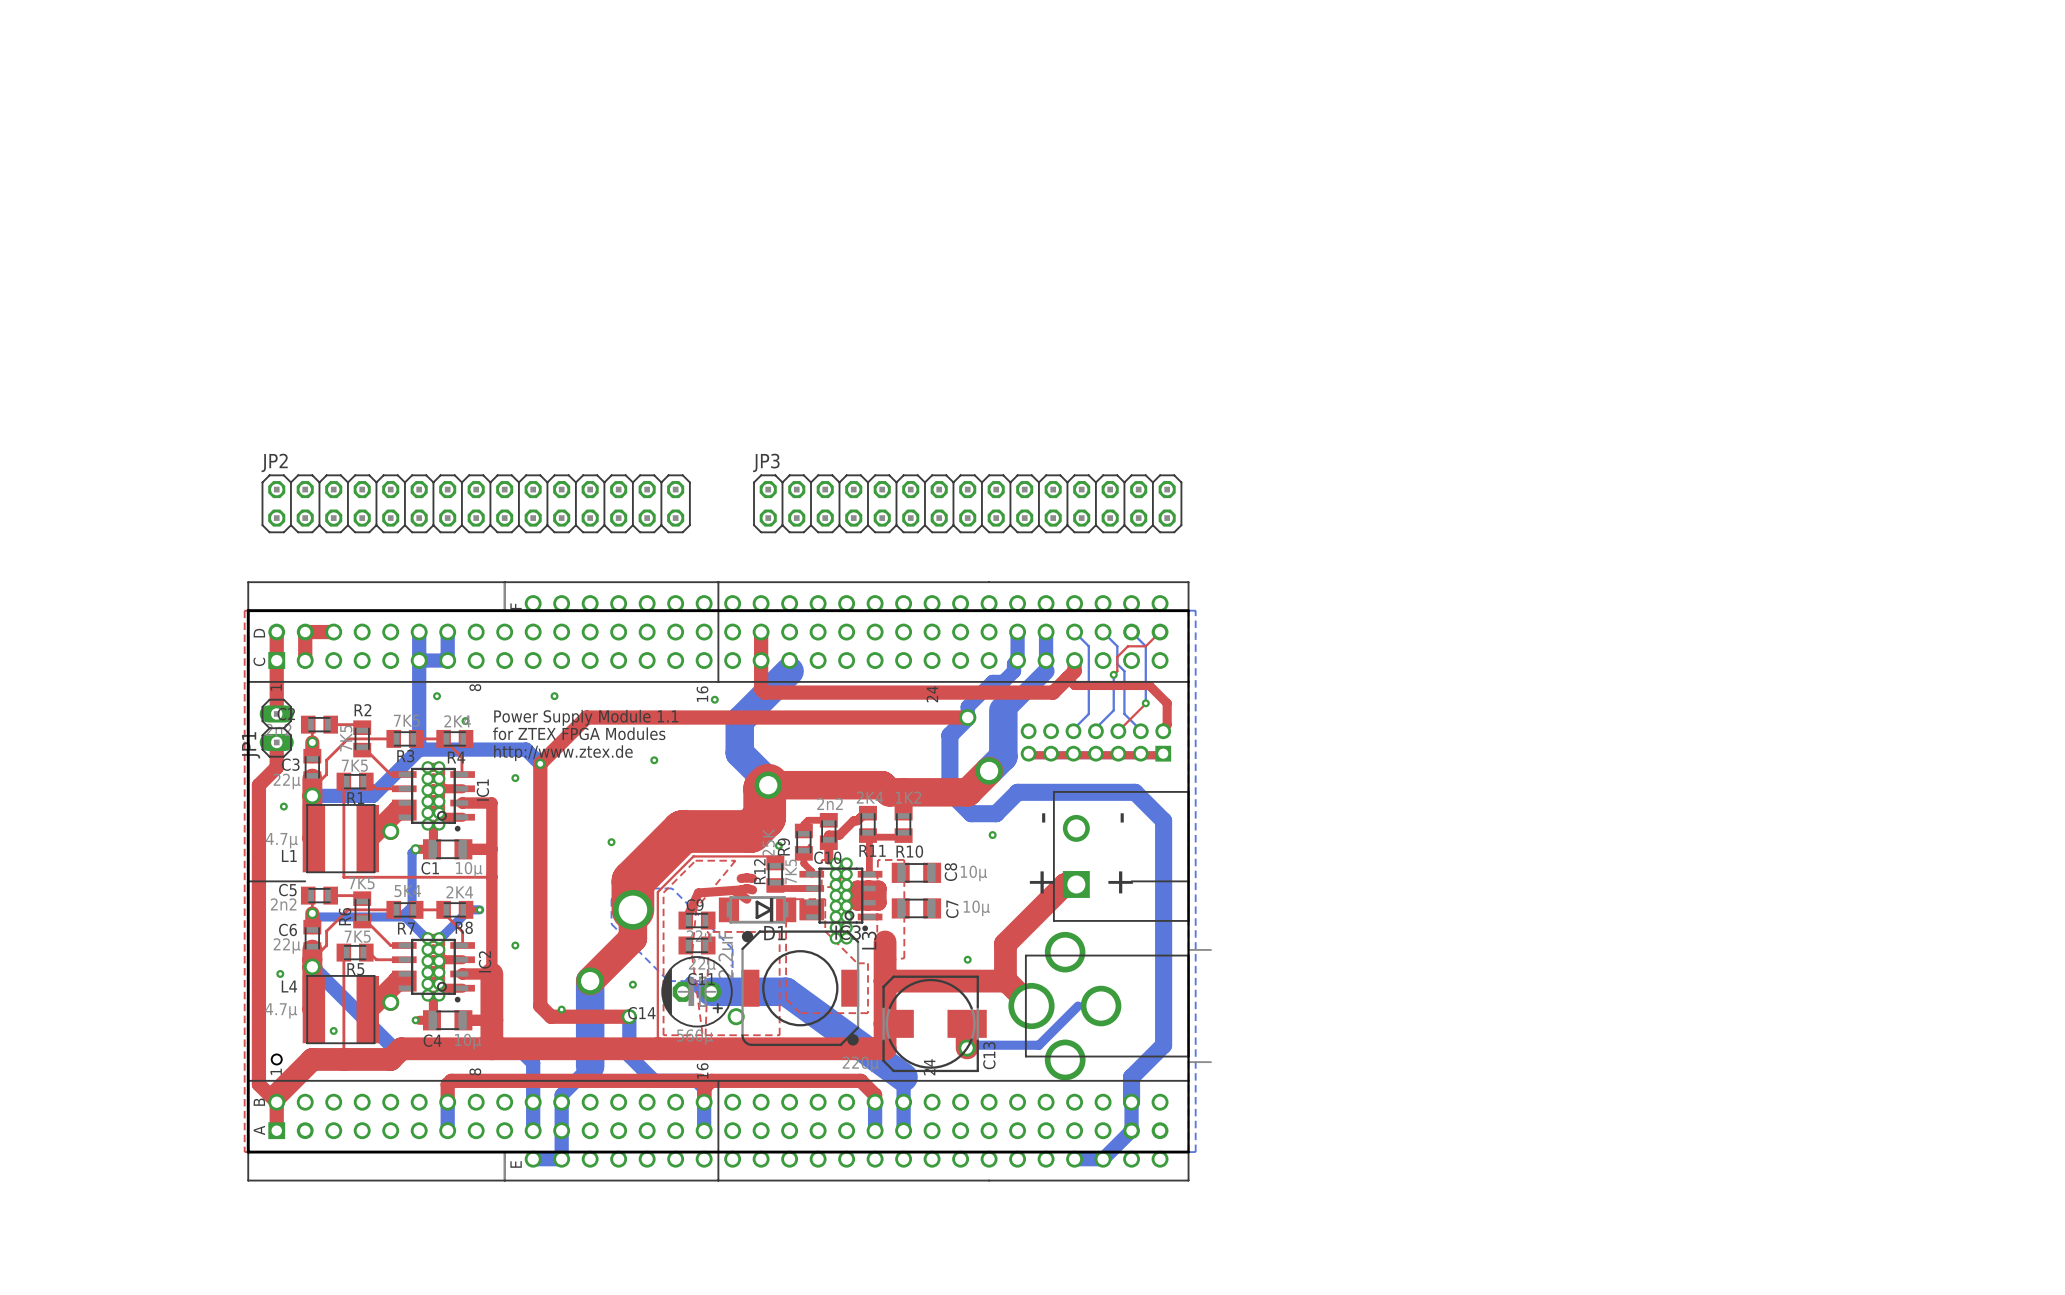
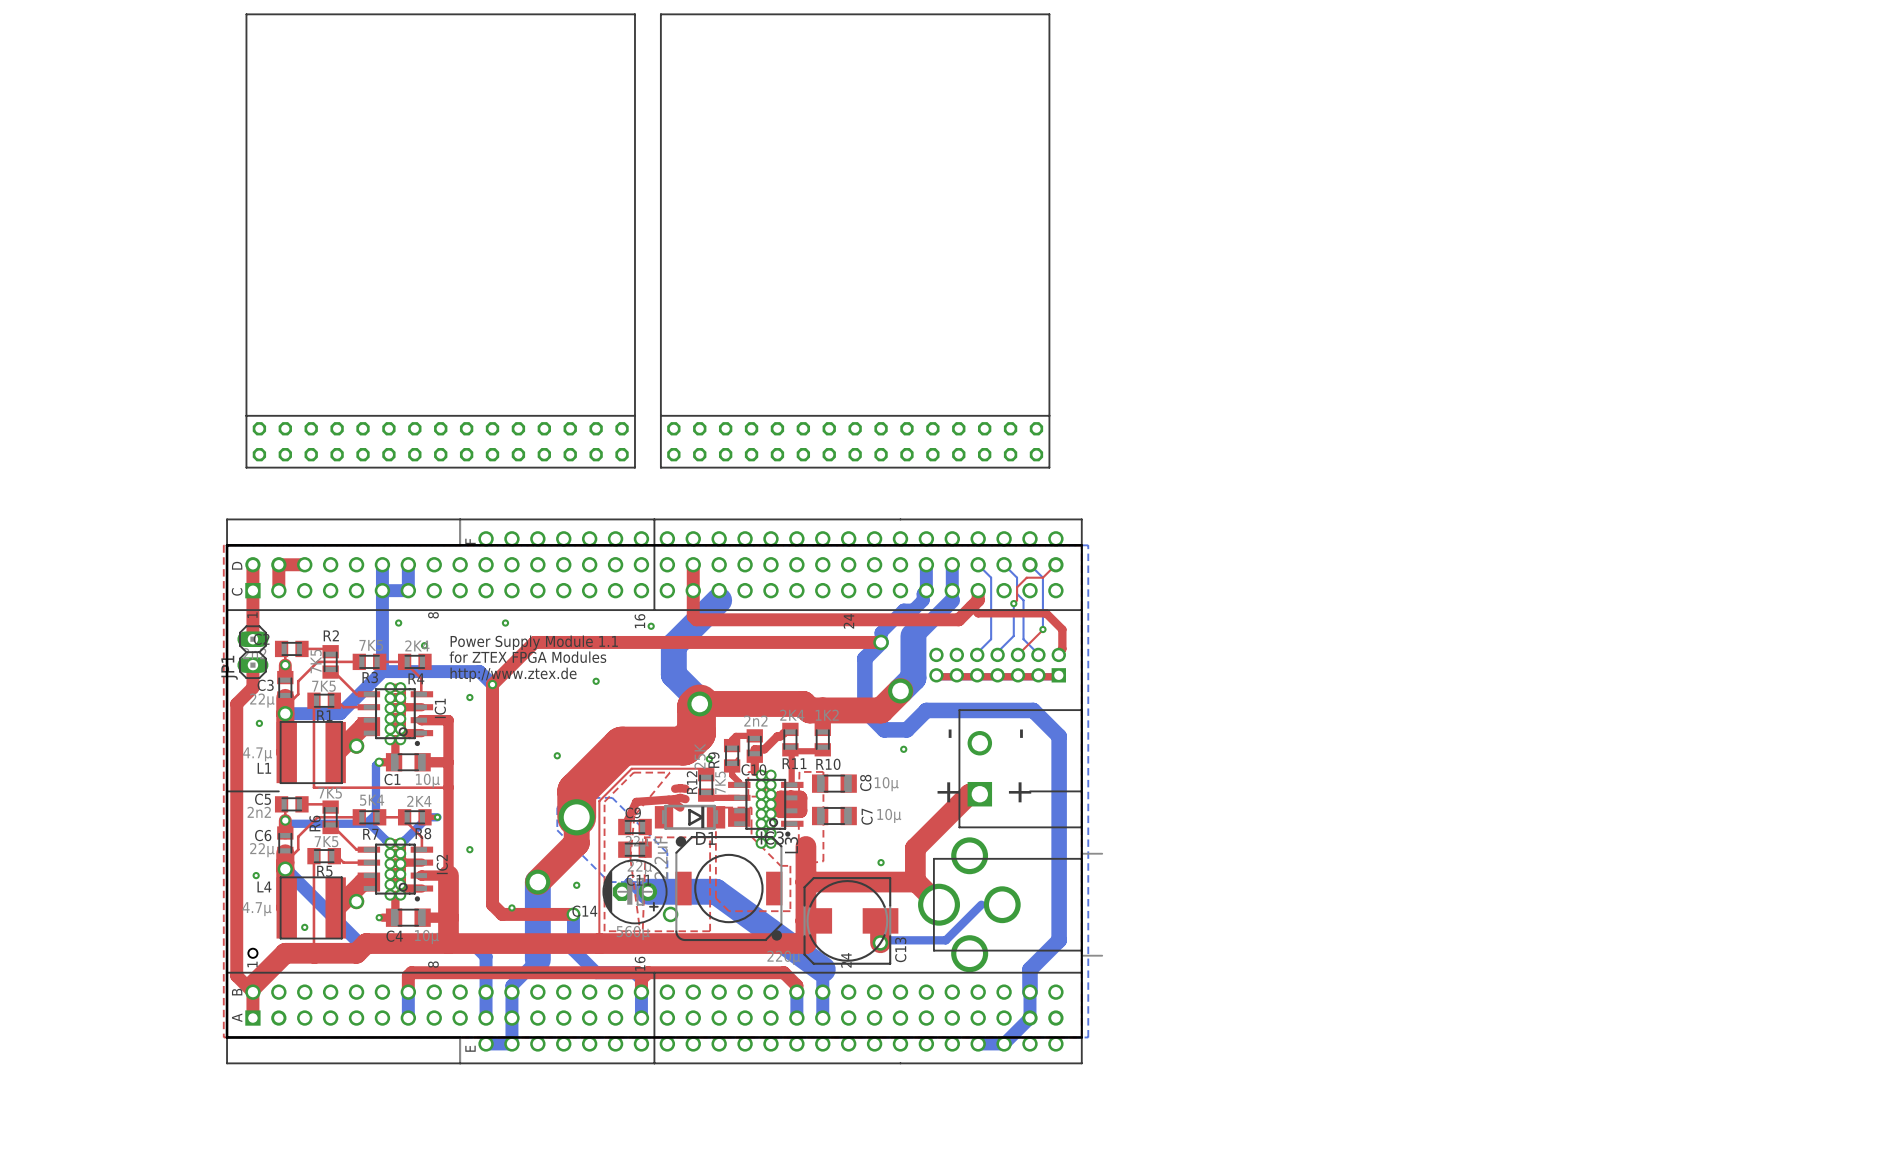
part: none -> (440, 240)
part: none -> (855, 240)
JP2: (476, 503) -> none
JP3: (967, 503) -> none

